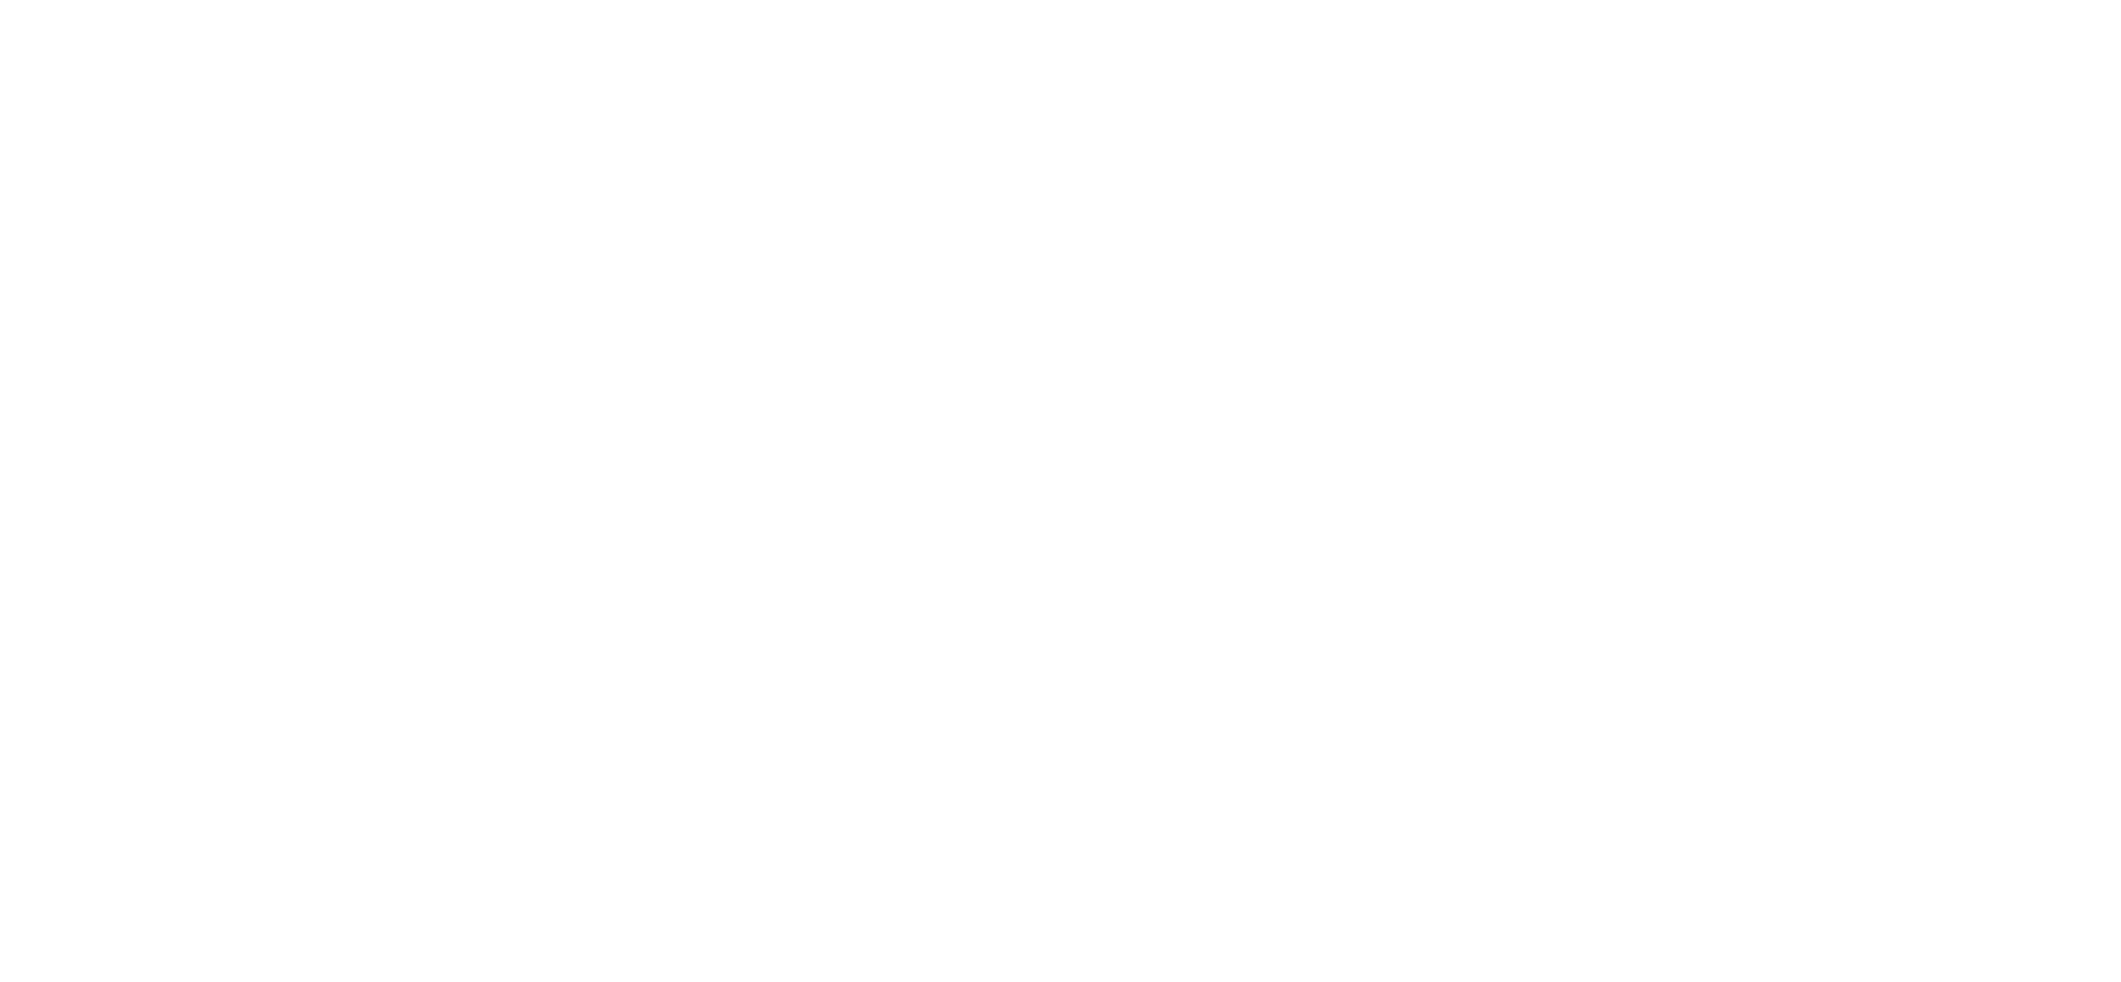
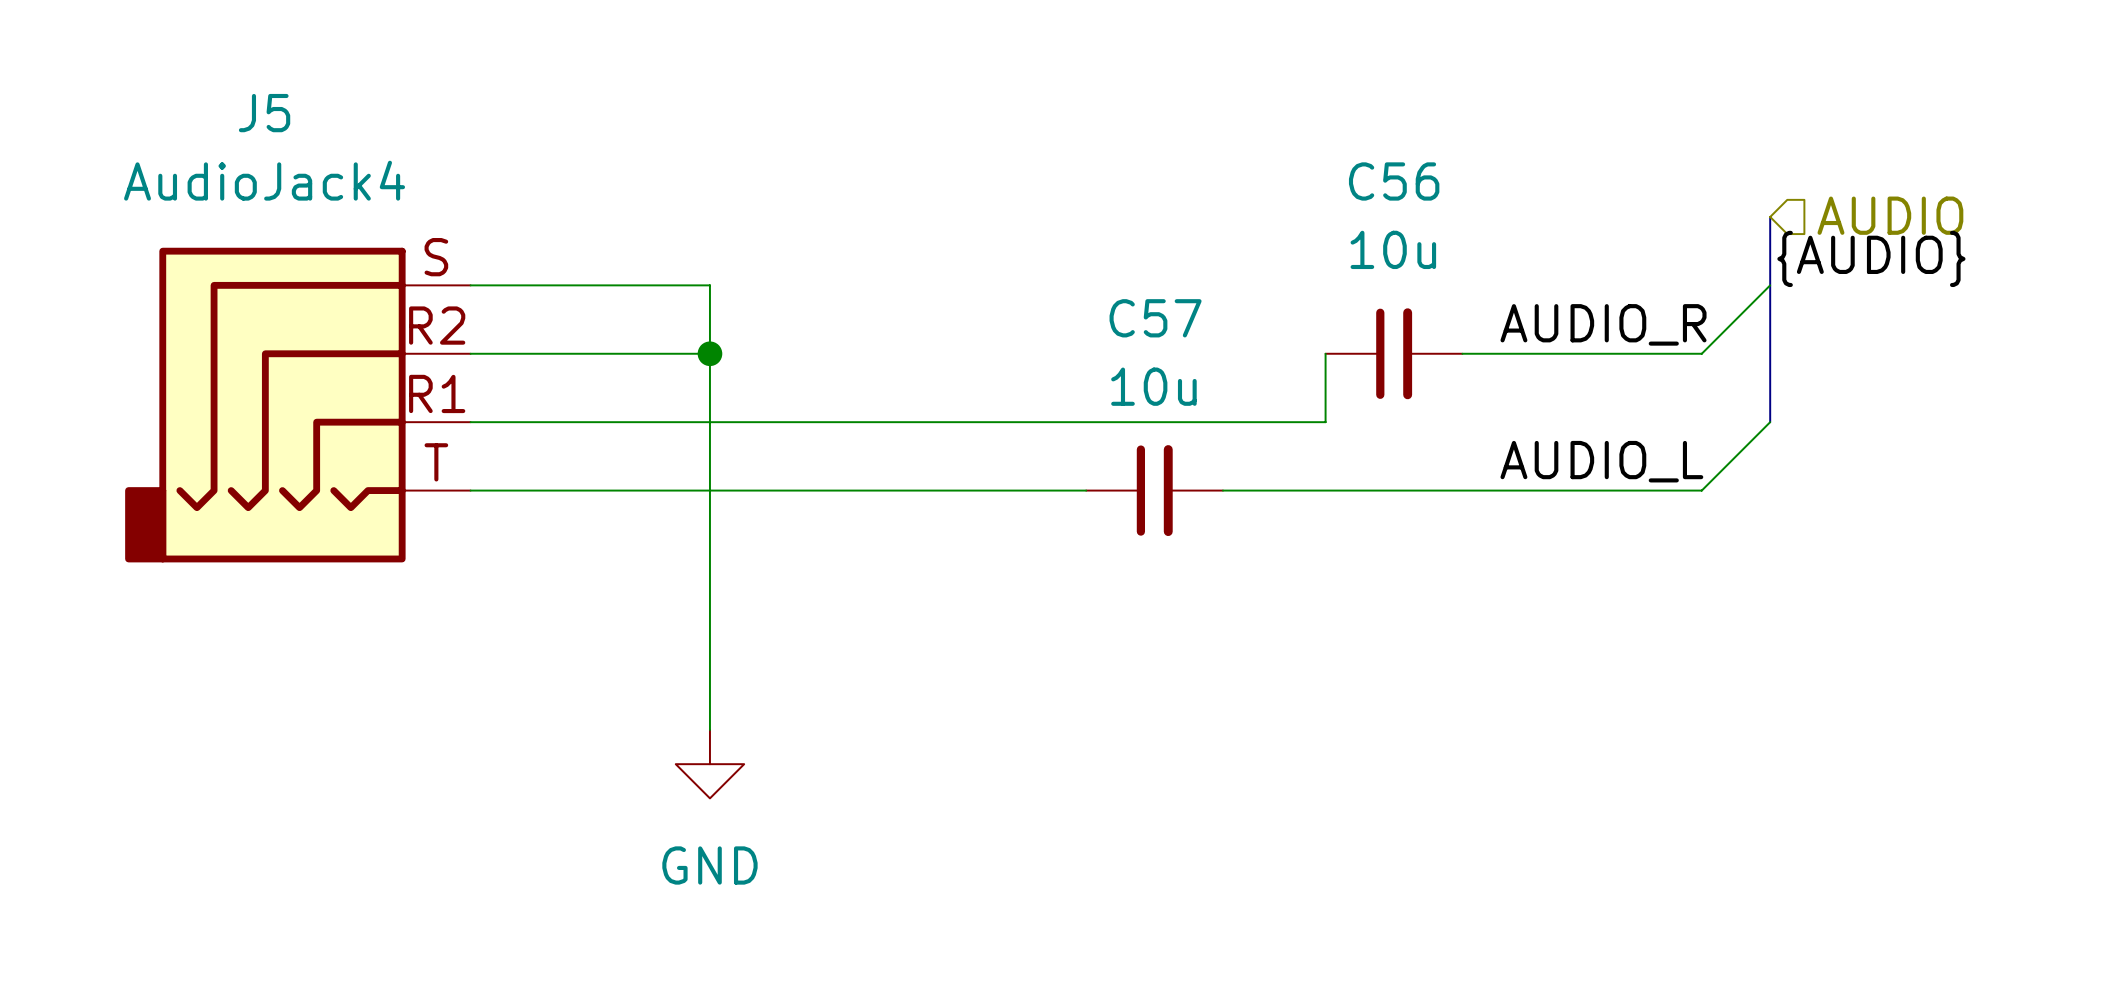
hierarchical label: none -> AUDIO (1890, 215)
bus: none -> (1770, 216) (1770, 422)
label: none -> {AUDIO} (1871, 258)
wire: none -> (470, 285) (709, 285) (709, 729)
wire: none -> (1770, 285) (1701, 353) (1462, 353)
label: none -> AUDIO_R (1603, 324)
wire: none -> (470, 353) (709, 353)
junction: none -> (709, 353)
wire: none -> (1325, 353) (1325, 422) (470, 422)
C56: none -> 10u (1393, 353)
J5: none -> AudioJack4 (297, 405)
wire: none -> (1770, 422) (1701, 490) (1222, 490)
label: none -> AUDIO_L (1601, 461)
wire: none -> (470, 490) (1086, 490)
C57: none -> 10u (1154, 490)
power symbol: none -> GND (709, 764)

